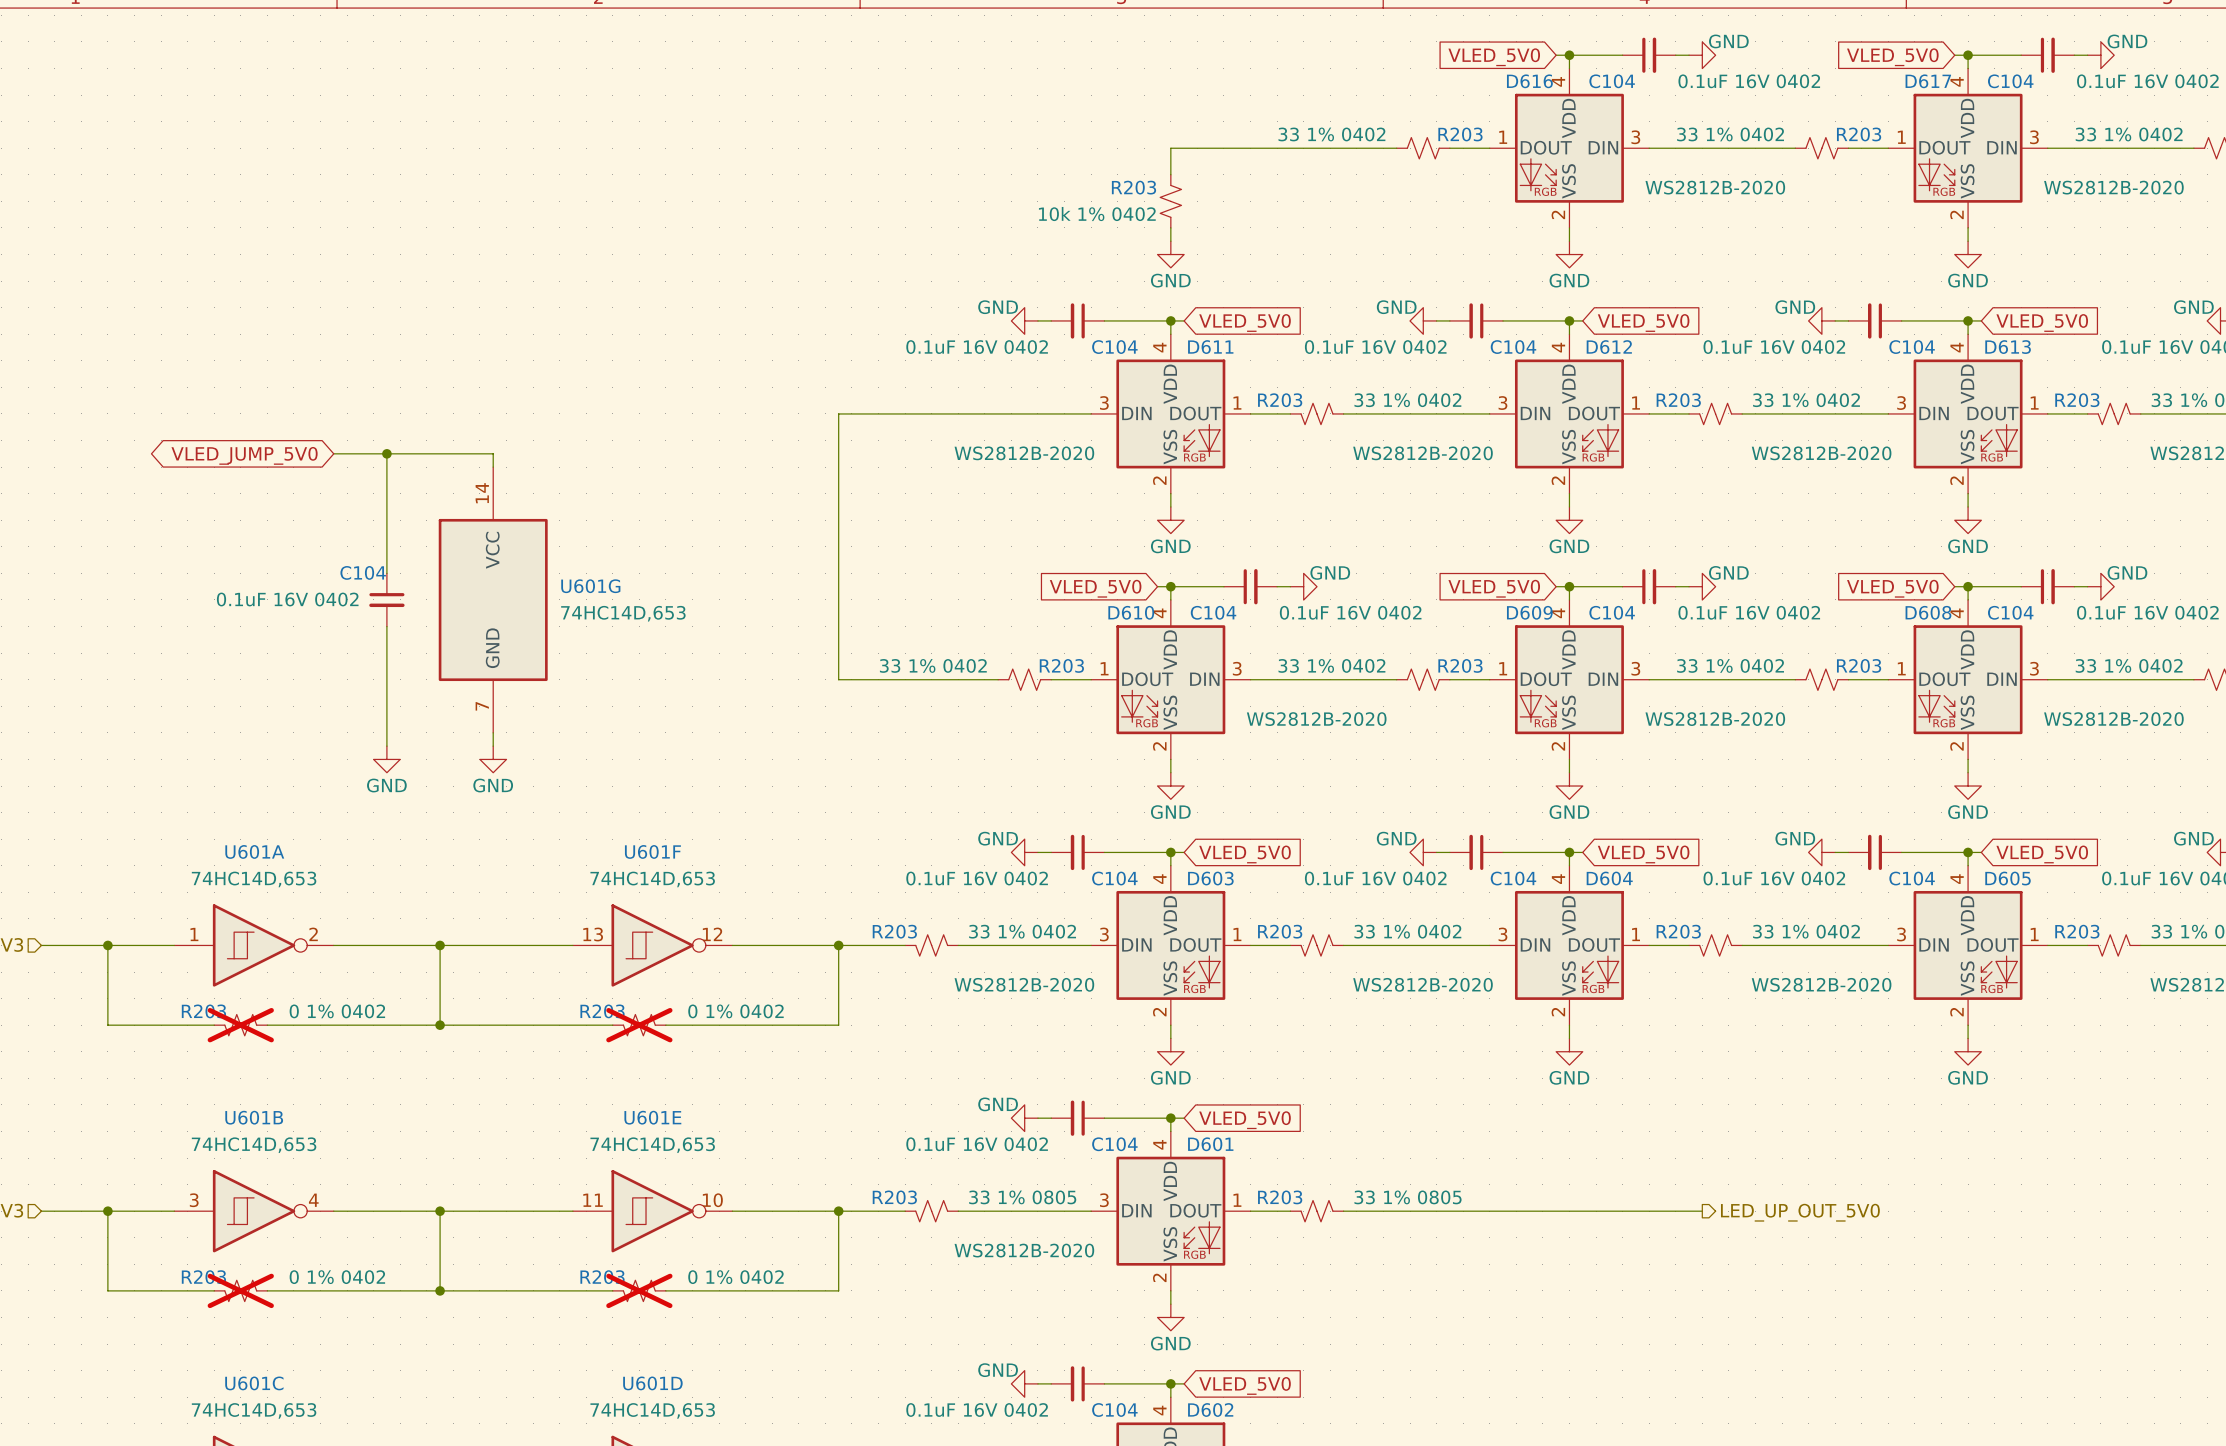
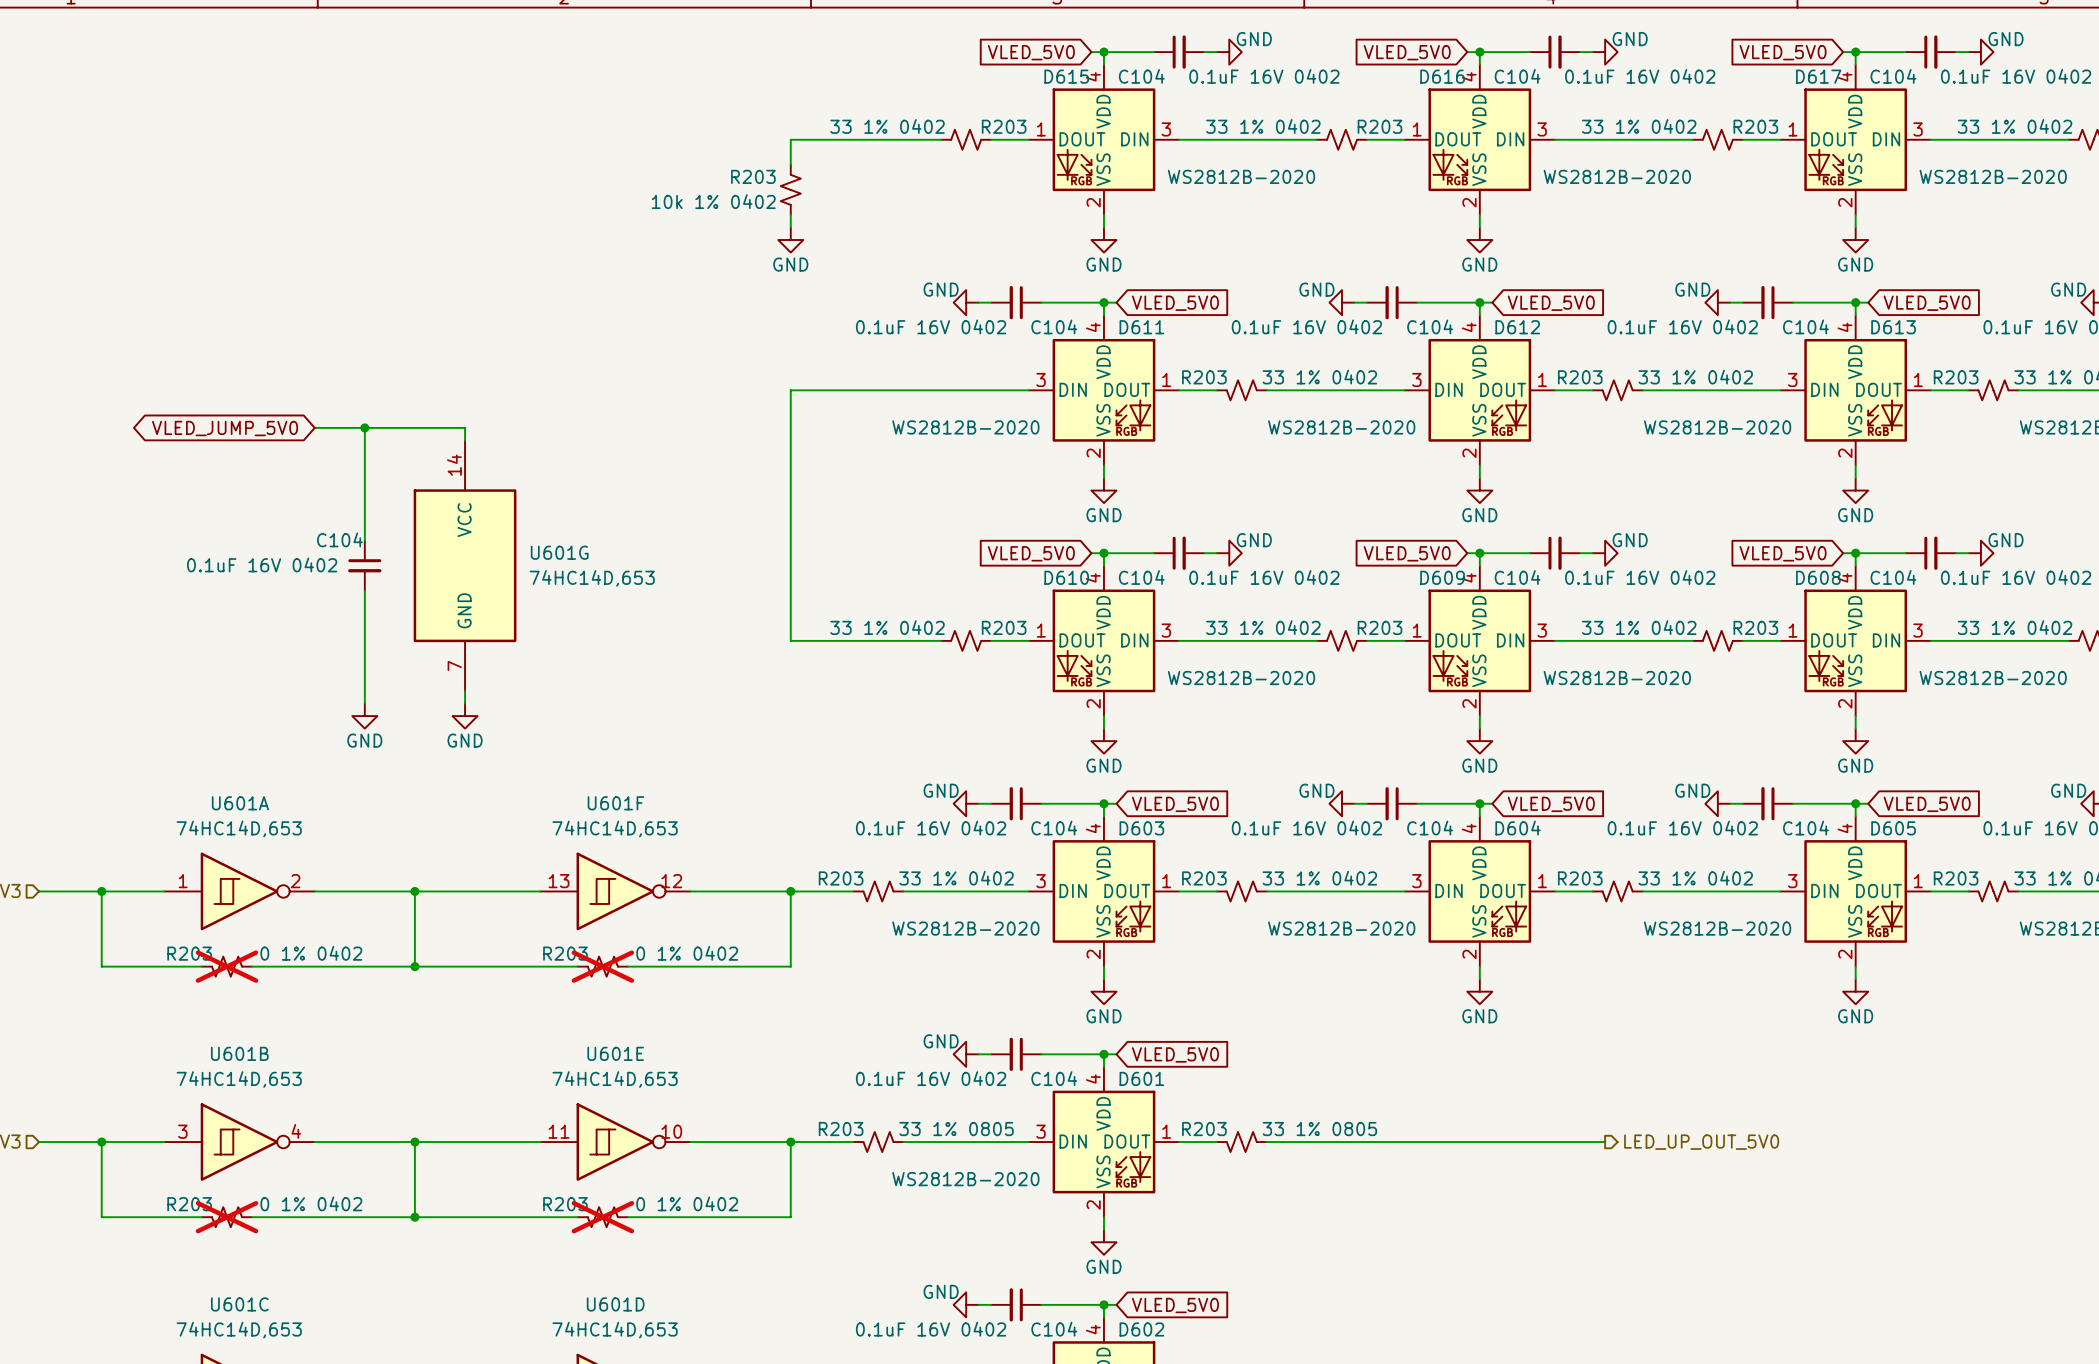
wire: none -> (1091, 52) (1154, 52)
wire: none -> (1103, 52) (1103, 64)
junction: none -> (1103, 52)
C104: none -> 0.1uF 16V 0402 (1179, 52)
wire: none -> (1204, 52) (1216, 52)
power symbol: none -> GND (1229, 52)
global label: none -> VLED_5V0 (1031, 52)
wire: none -> (941, 139) (790, 139) (790, 164)
R203: none -> 33 1% 0402 (966, 139)
wire: none -> (991, 139) (1028, 139)
D615: none -> WS2812B-2020 (1103, 139)
R203: none -> 10k 1% 0402 (790, 189)
R203: 10k 1% 0402 (1170, 201) -> none
wire: none -> (790, 214) (790, 227)
power symbol: none -> GND (790, 240)

